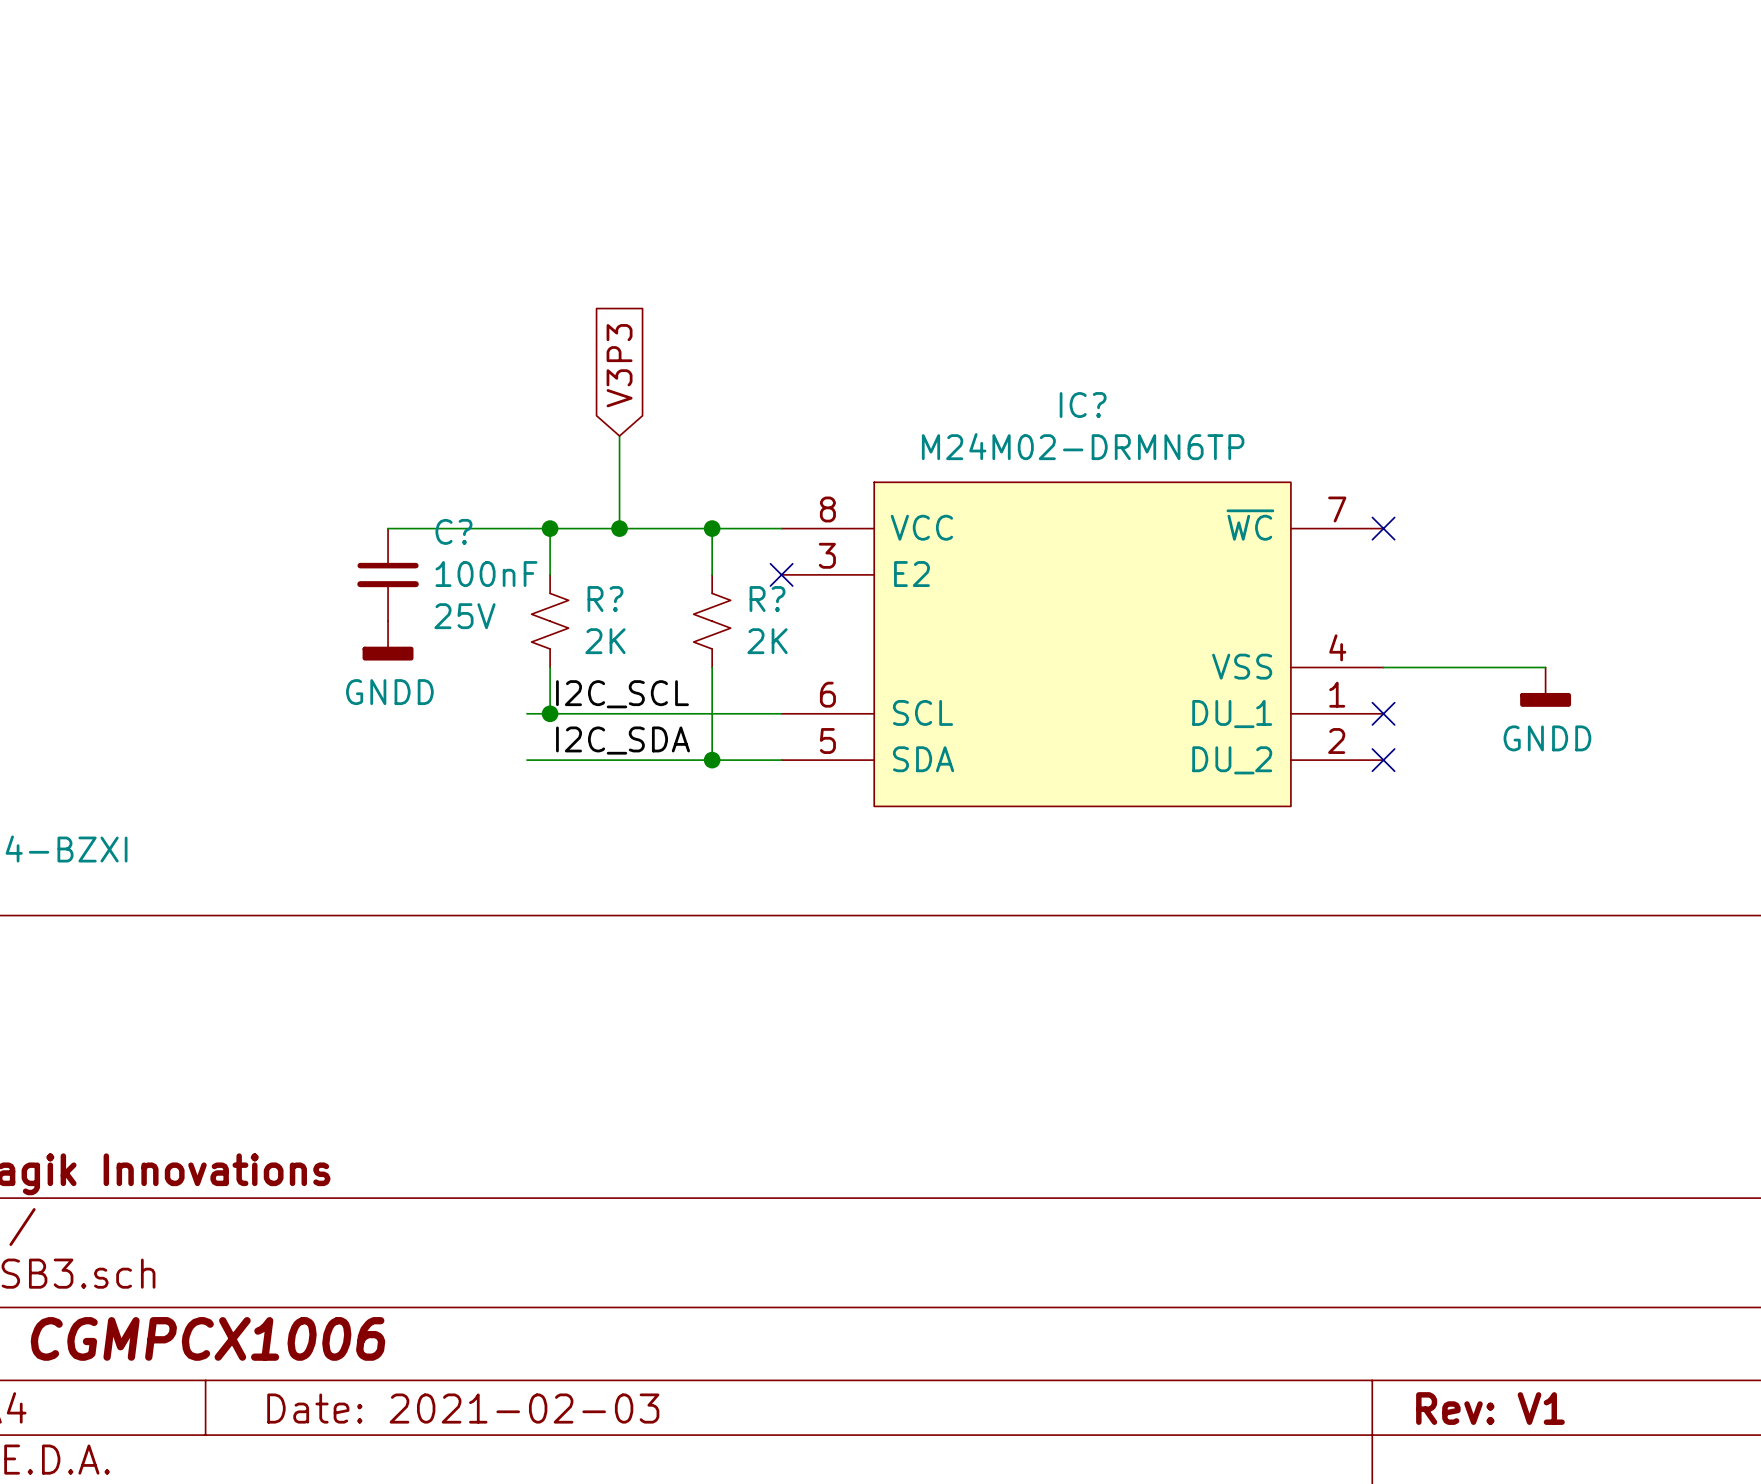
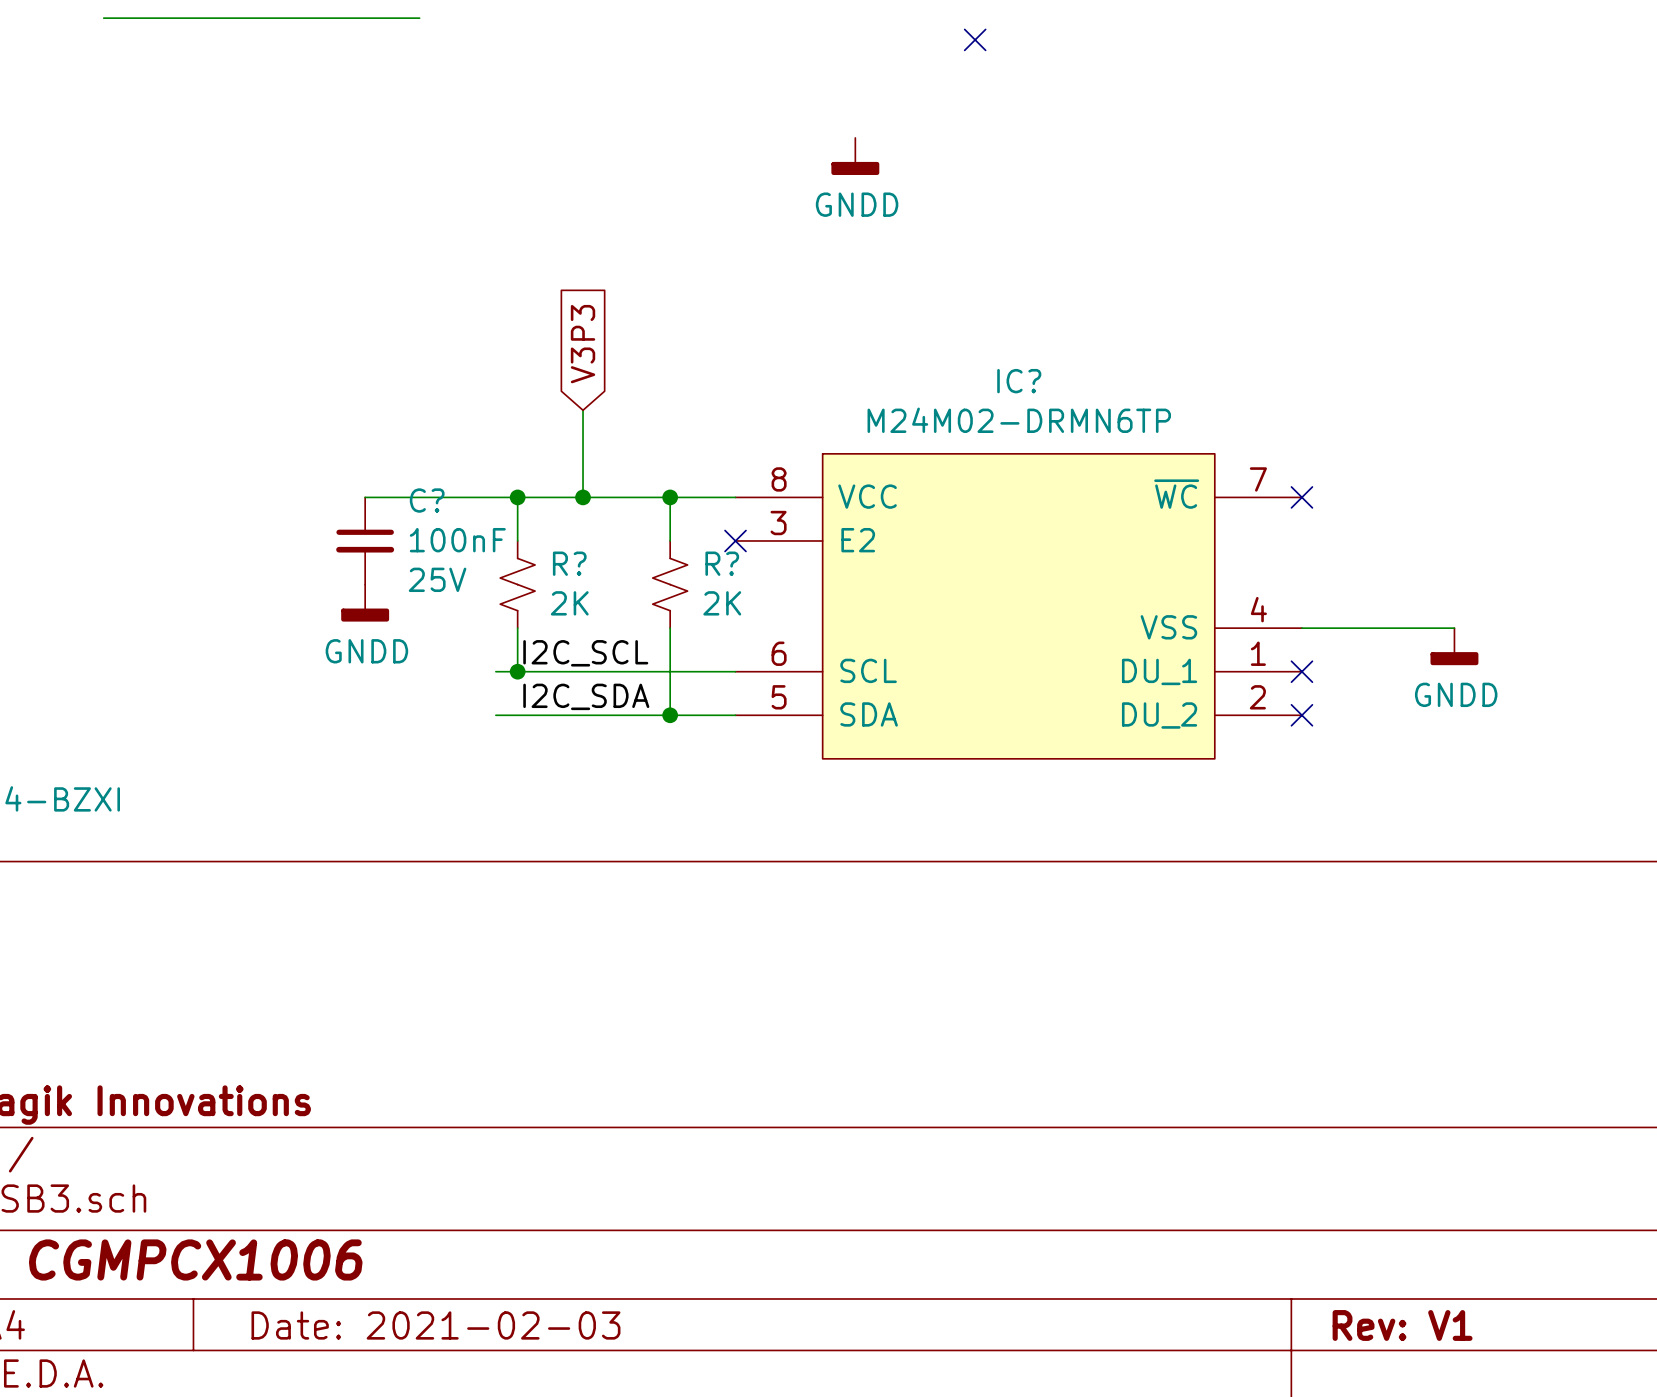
wire: none -> (103, 18) (419, 18)
no-connect mark: none -> (975, 39)
power symbol: none -> GNDD (855, 156)

